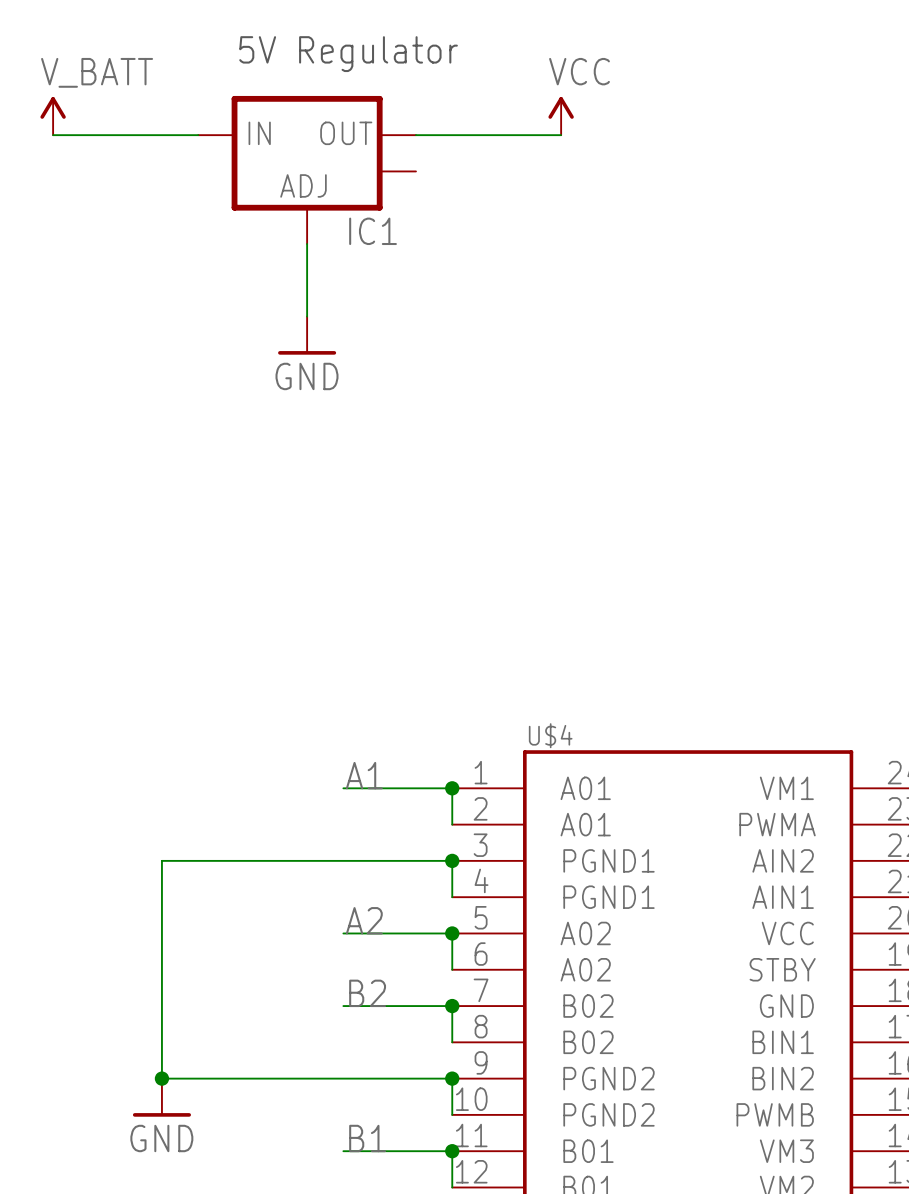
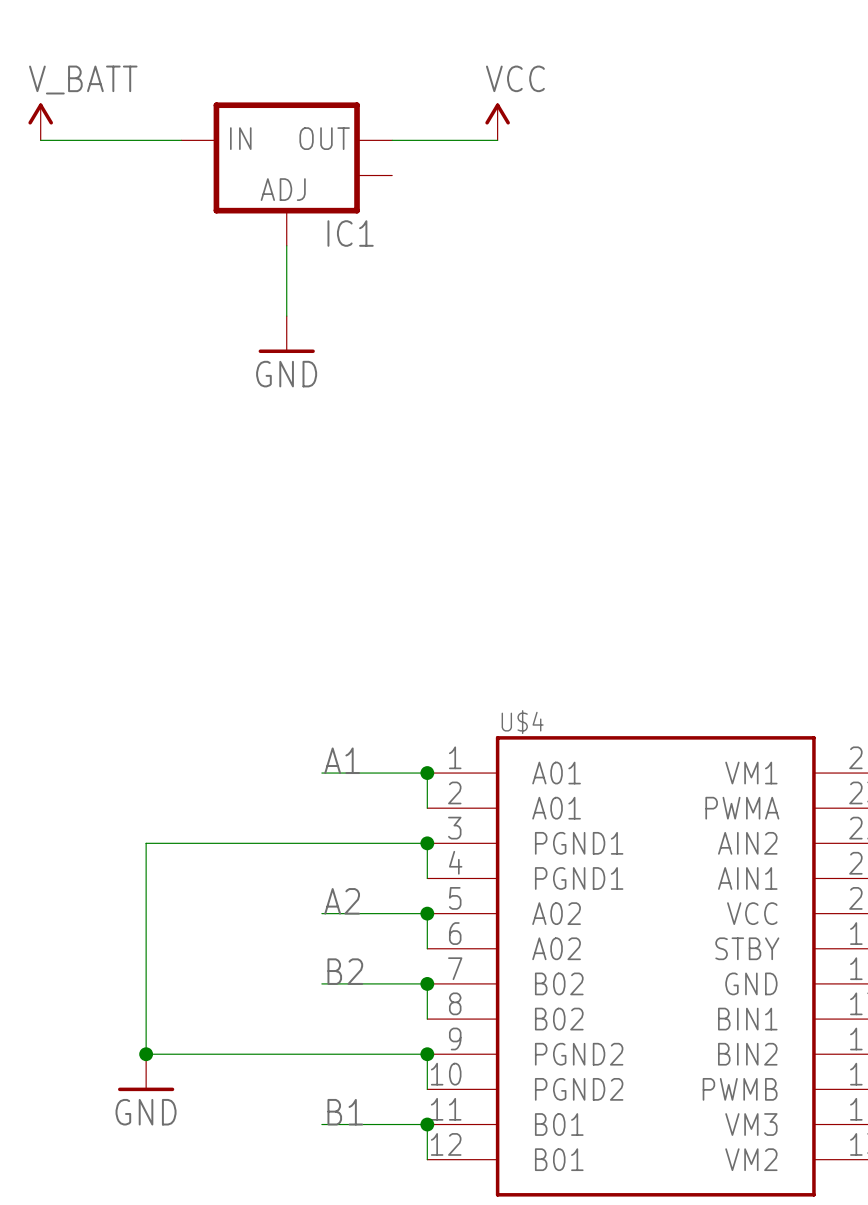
text: 5V Regulator (348, 54) -> none
power symbol position: VCC (561, 116) -> VCC (497, 121)
wire: (524, 135) (561, 135) -> none

